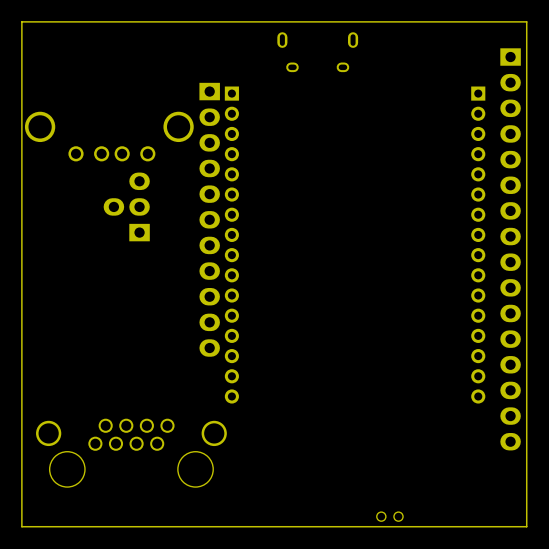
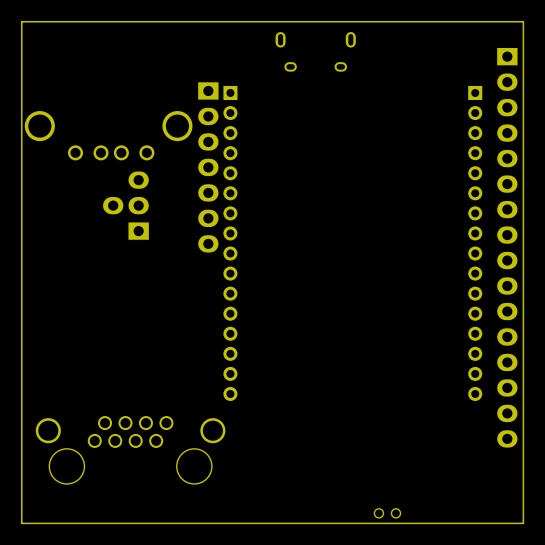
part: (209, 219) -> none

